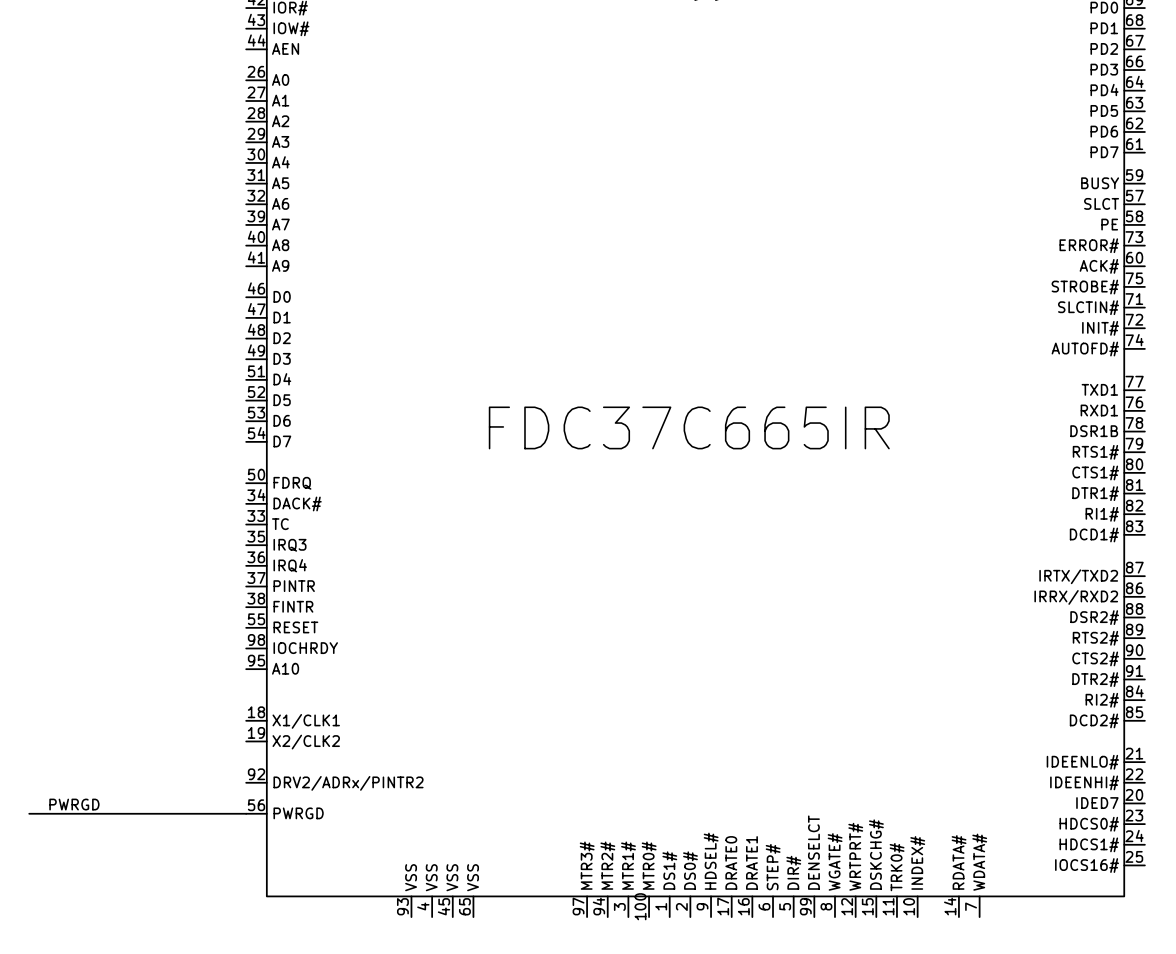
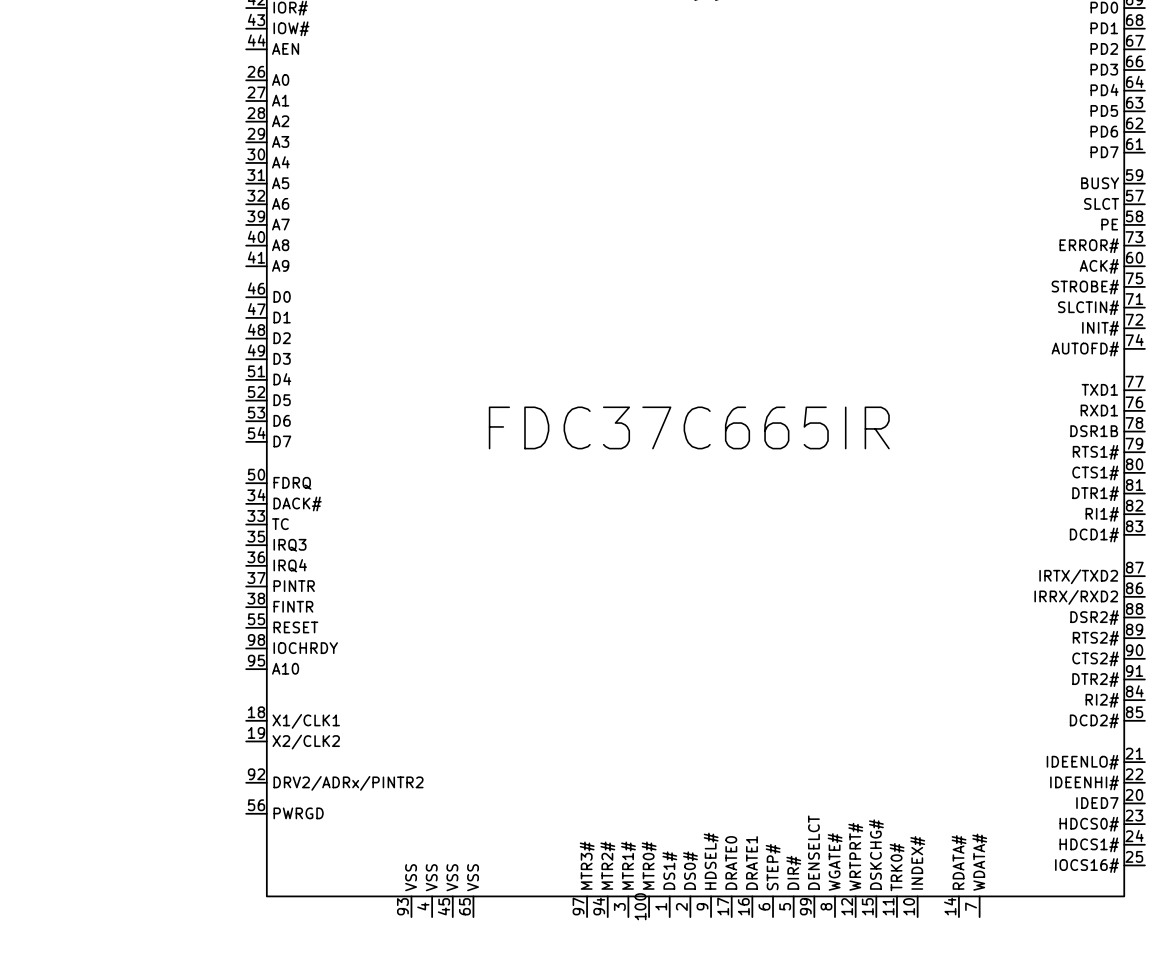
label: PWRGD (74, 804) -> none
wire: (29, 813) (246, 813) -> none

